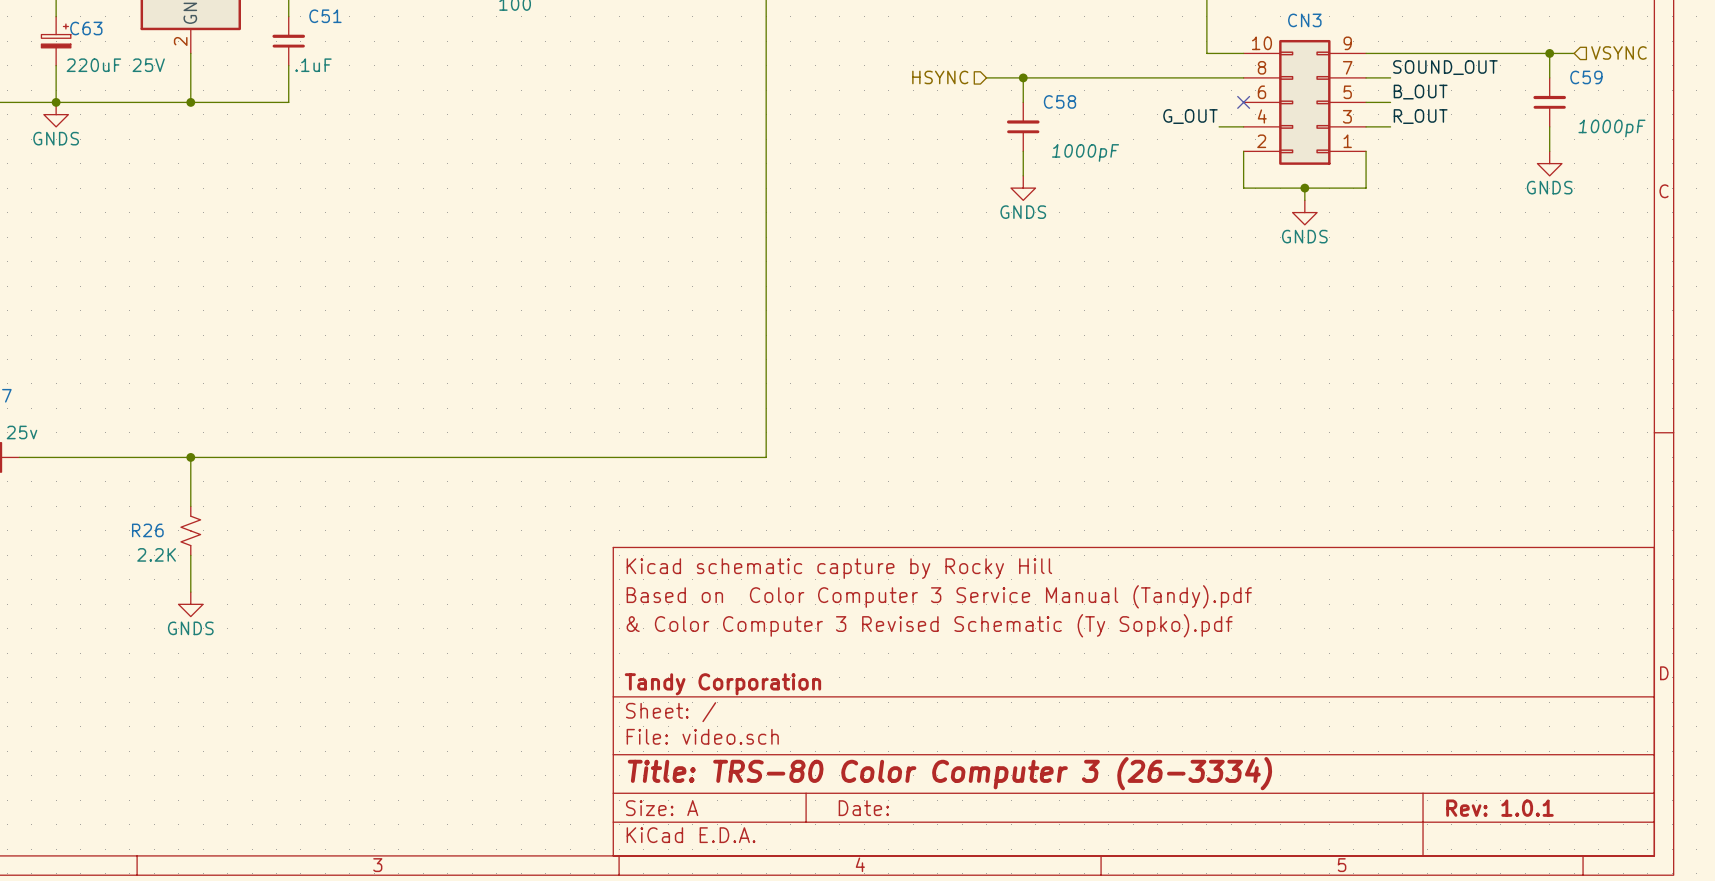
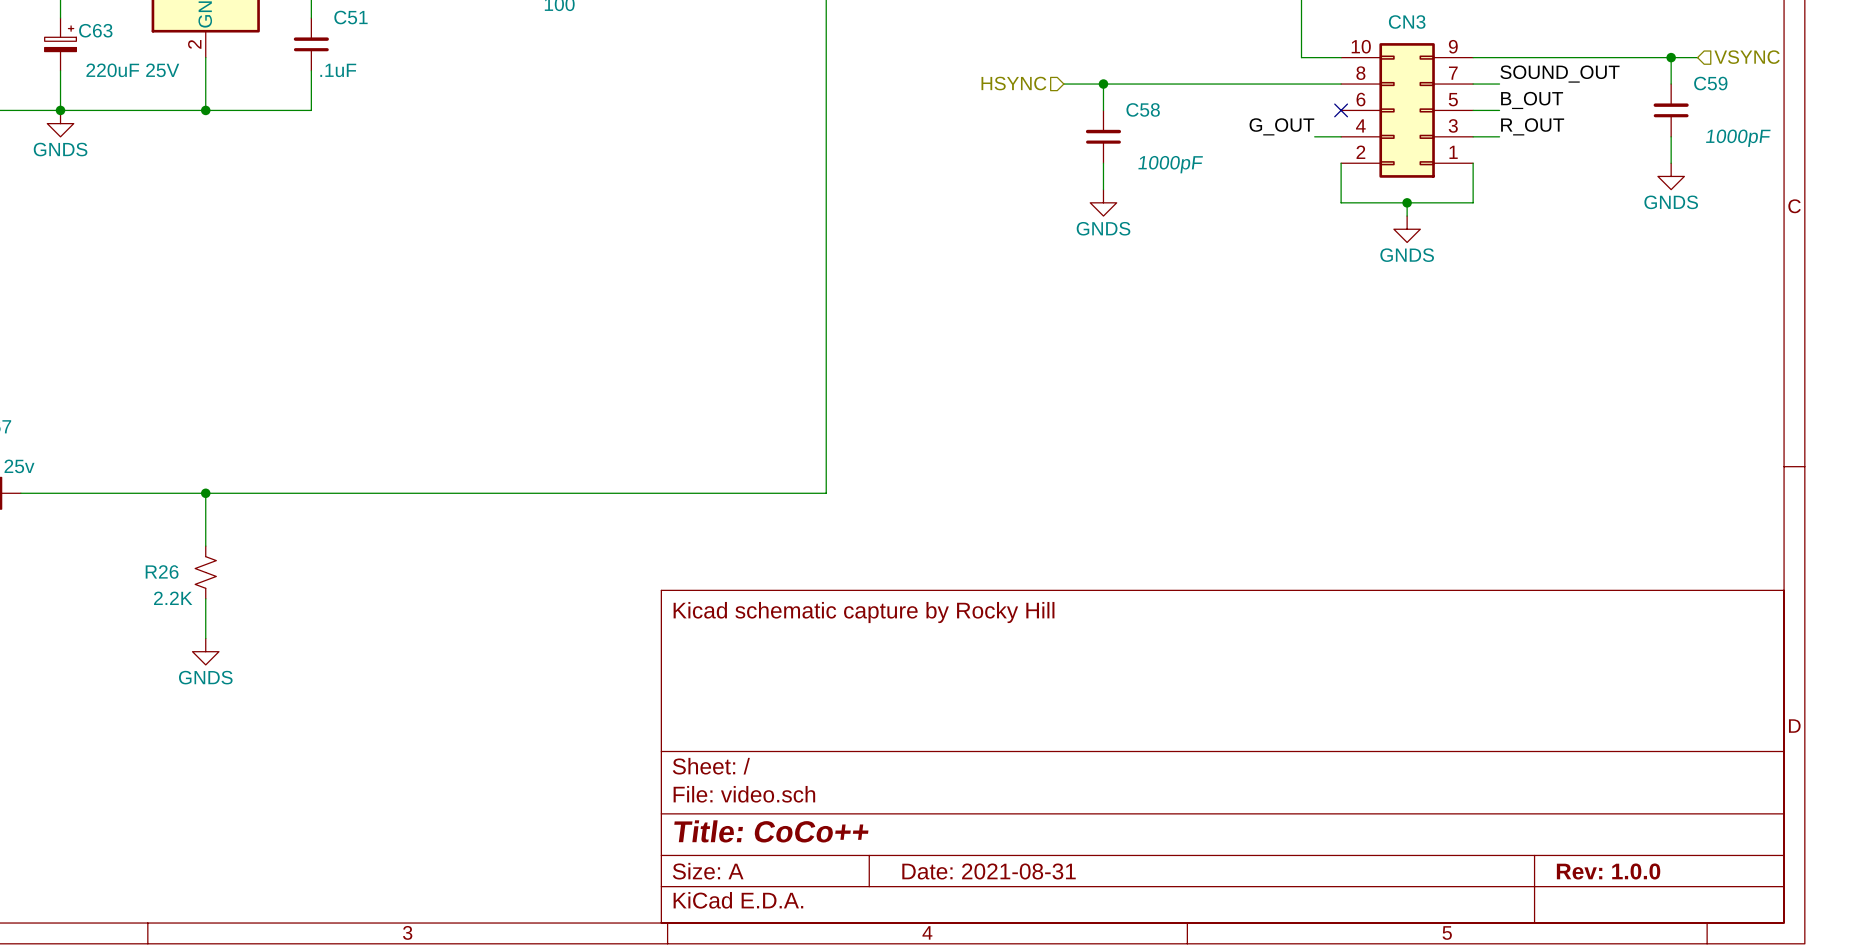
title block: Based on Color Computer 3 Service Manual (Tandy).pdf (939, 596) -> none
title block: & Color Computer 3 Revised Schematic (Ty Sopko).pdf (929, 625) -> none
title block: Tandy Corporation (722, 684) -> none
title block: Title: TRS-80 Color Computer 3 (26-3334) (949, 773) -> Title: CoCo++ (771, 831)
title block: Date: (863, 808) -> Date: 2021-08-31 (989, 871)
title block: Rev: 1.0.1 (1499, 808) -> Rev: 1.0.0 (1608, 871)

